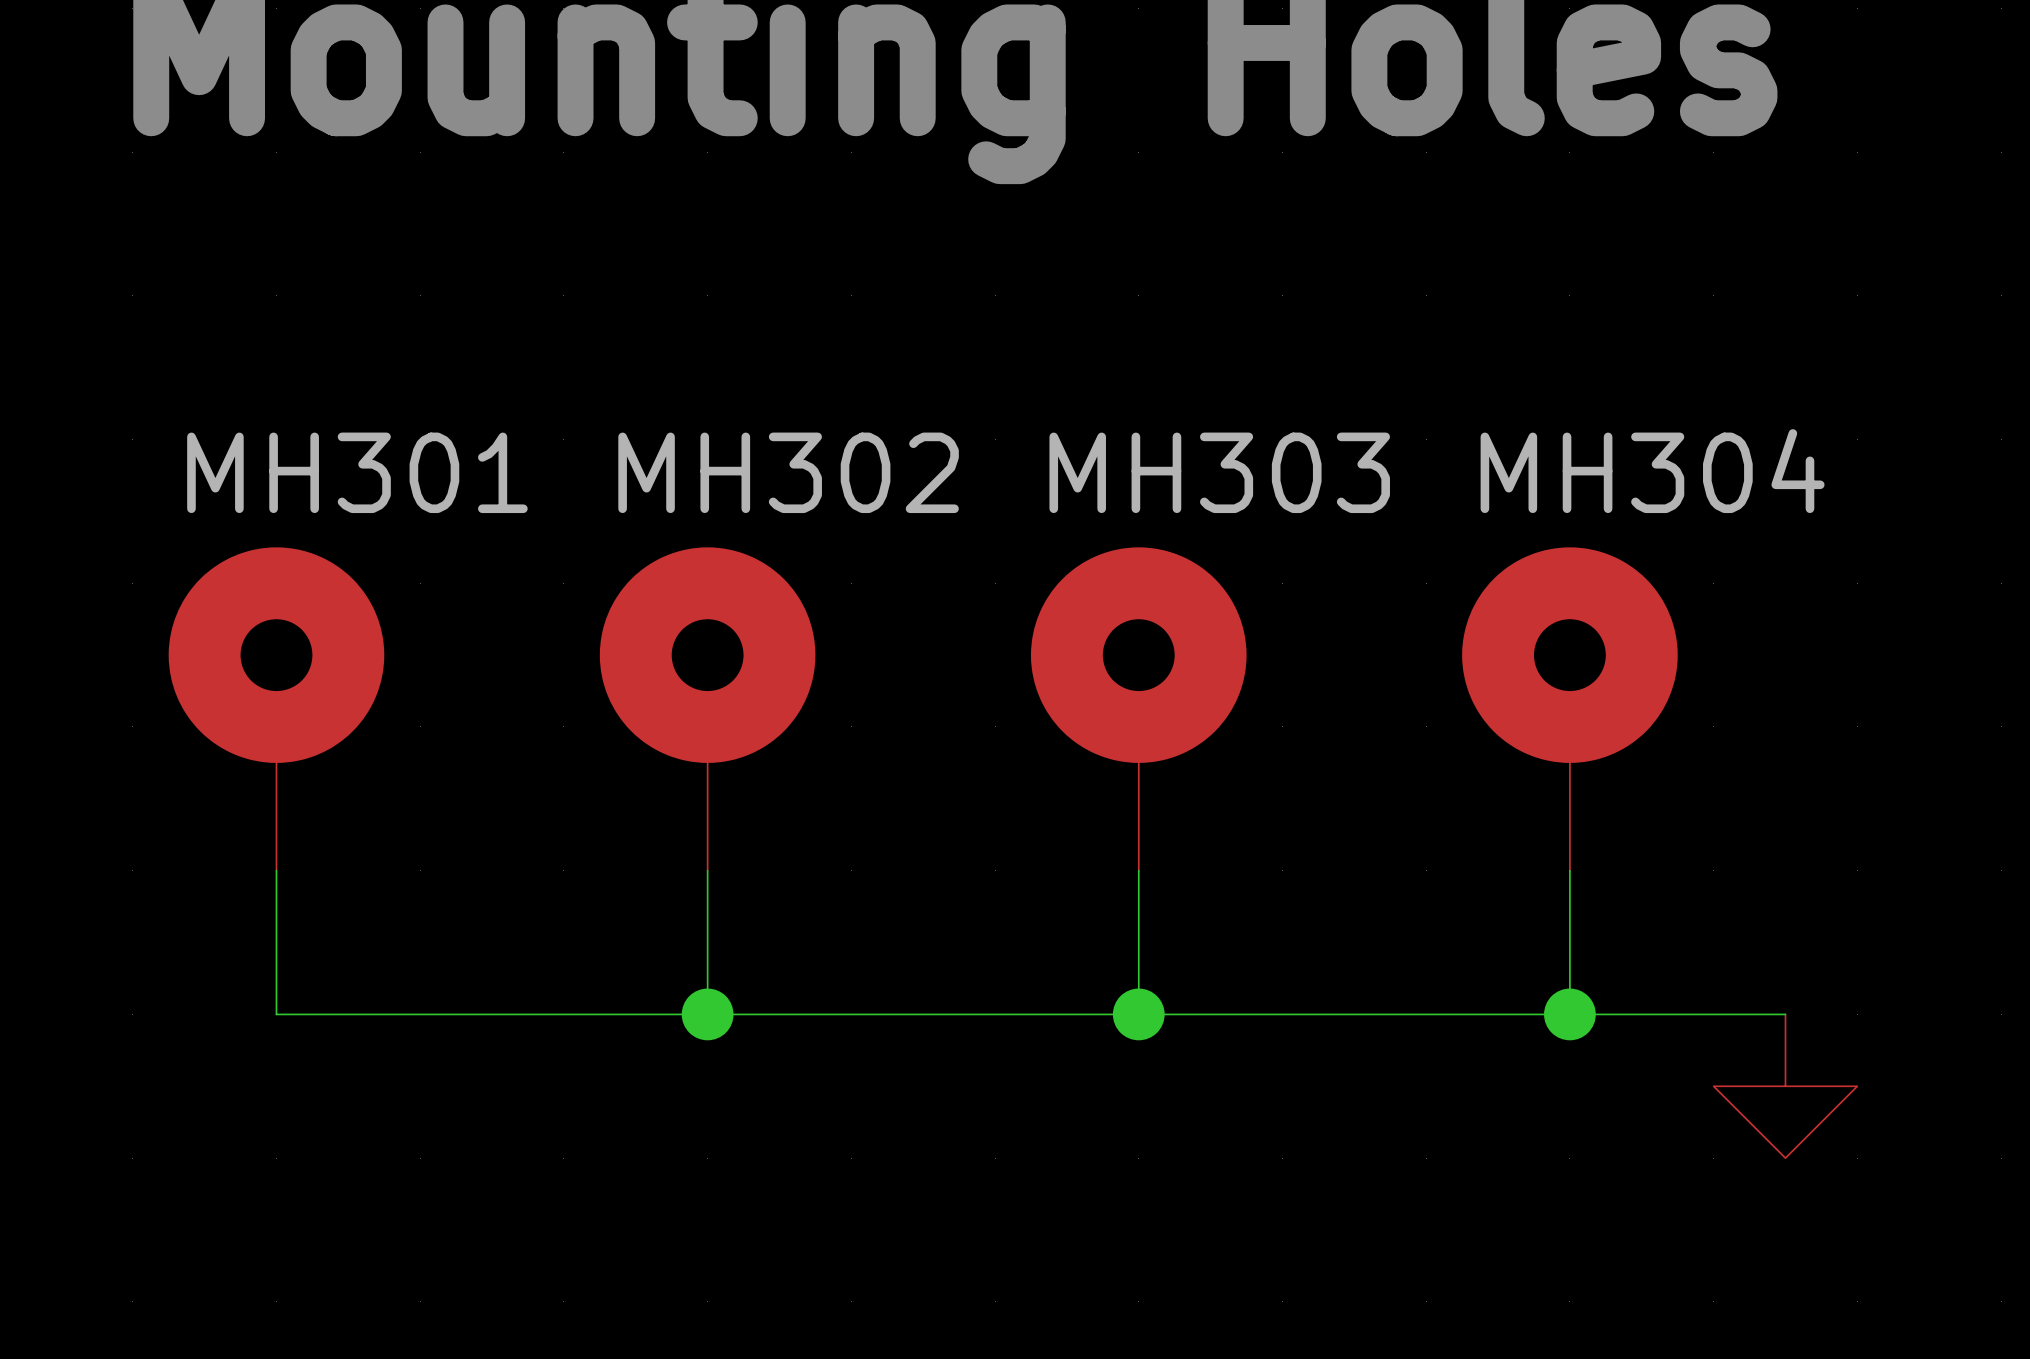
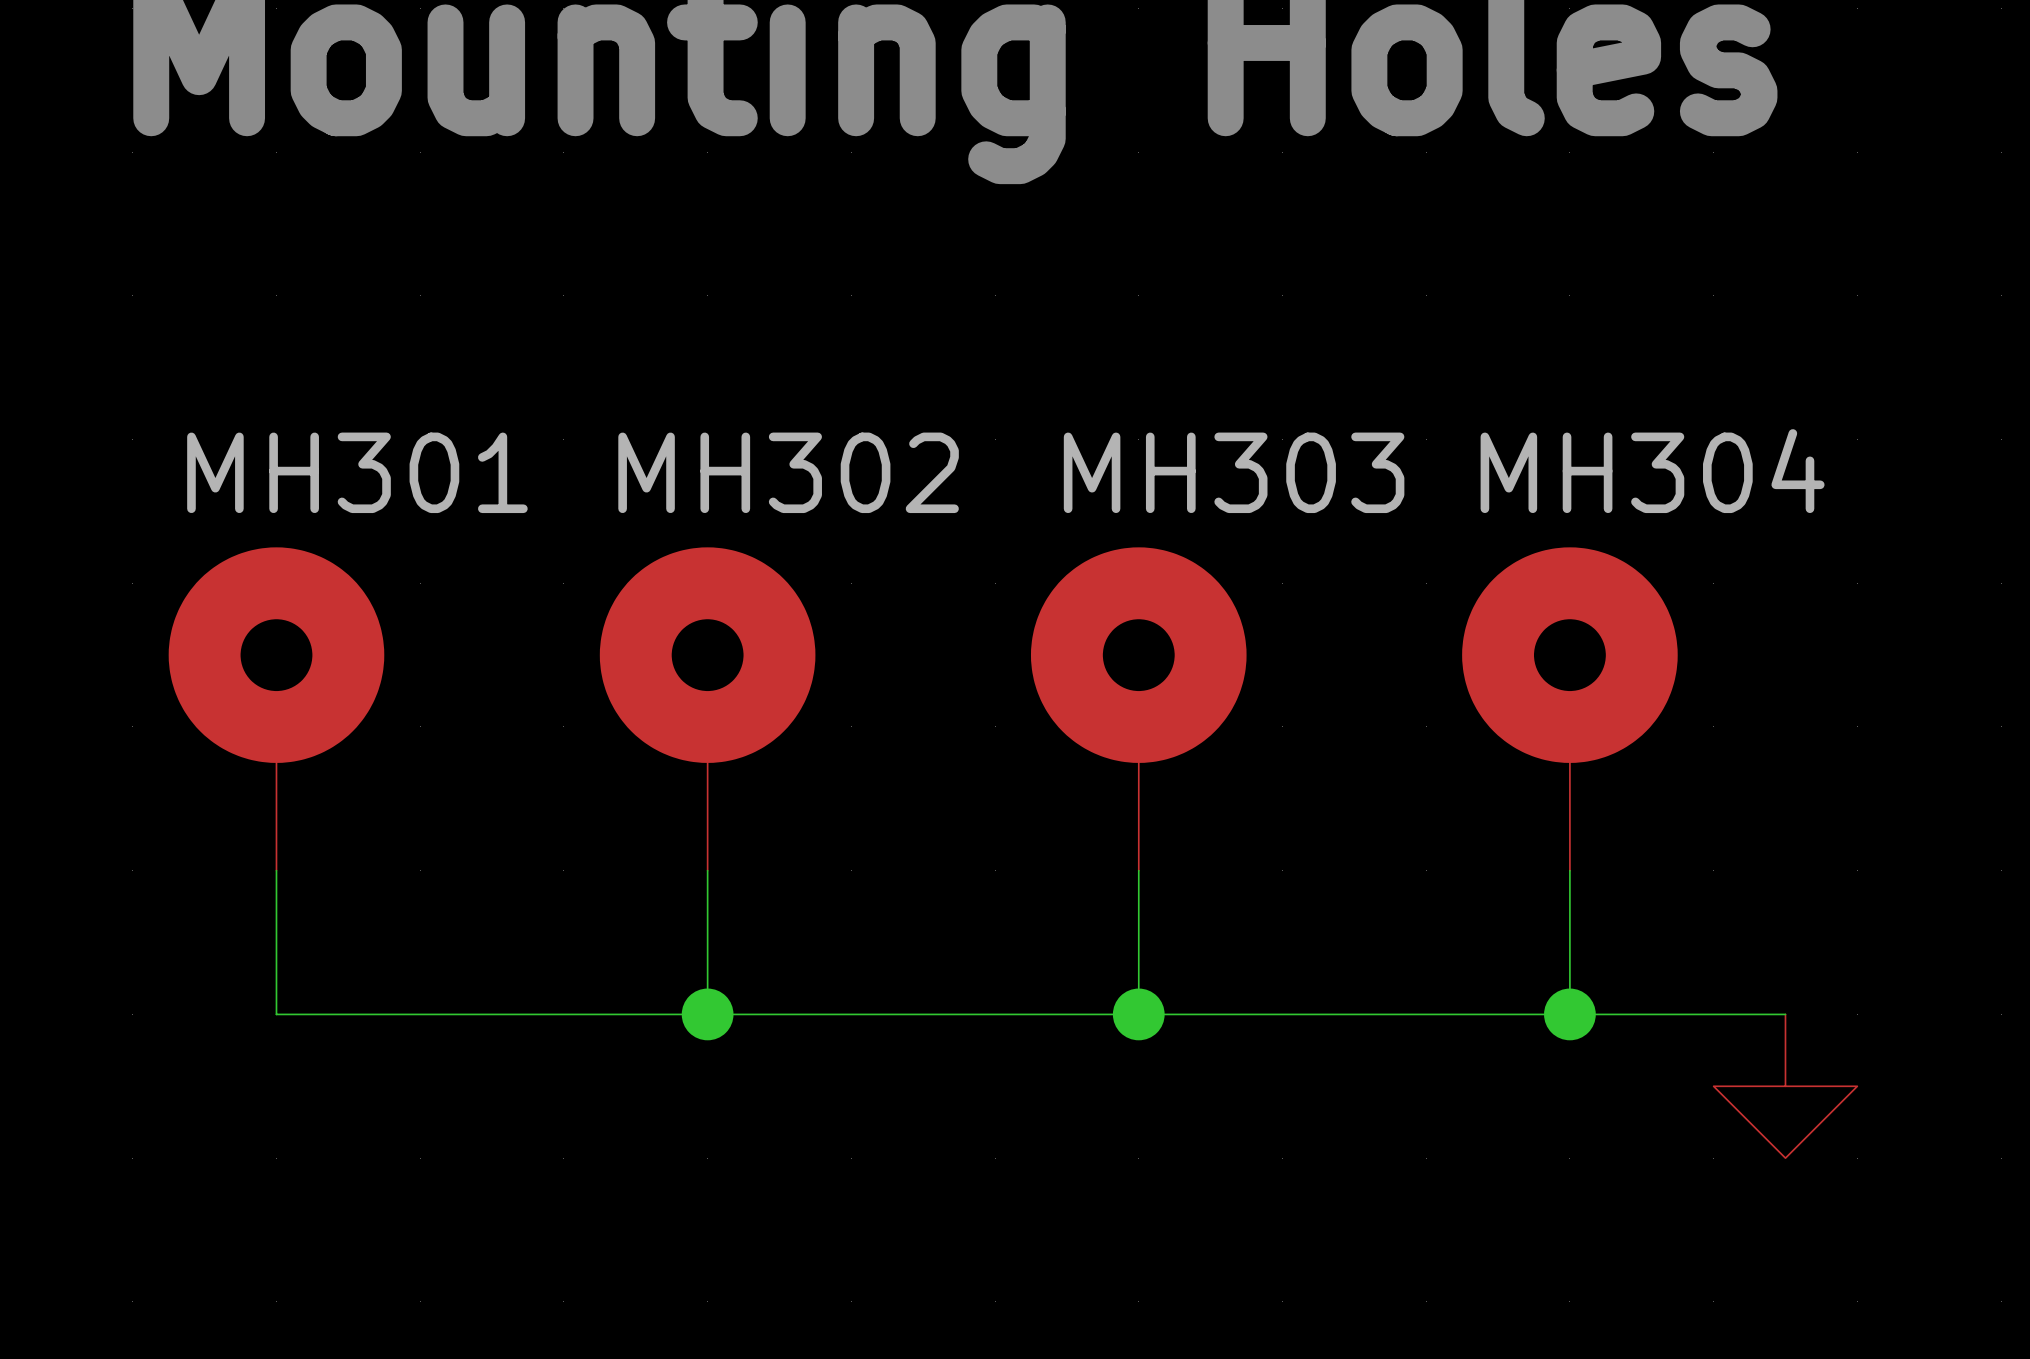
MH303 name position: MH303 (1219, 472) -> MH303 (1234, 472)

